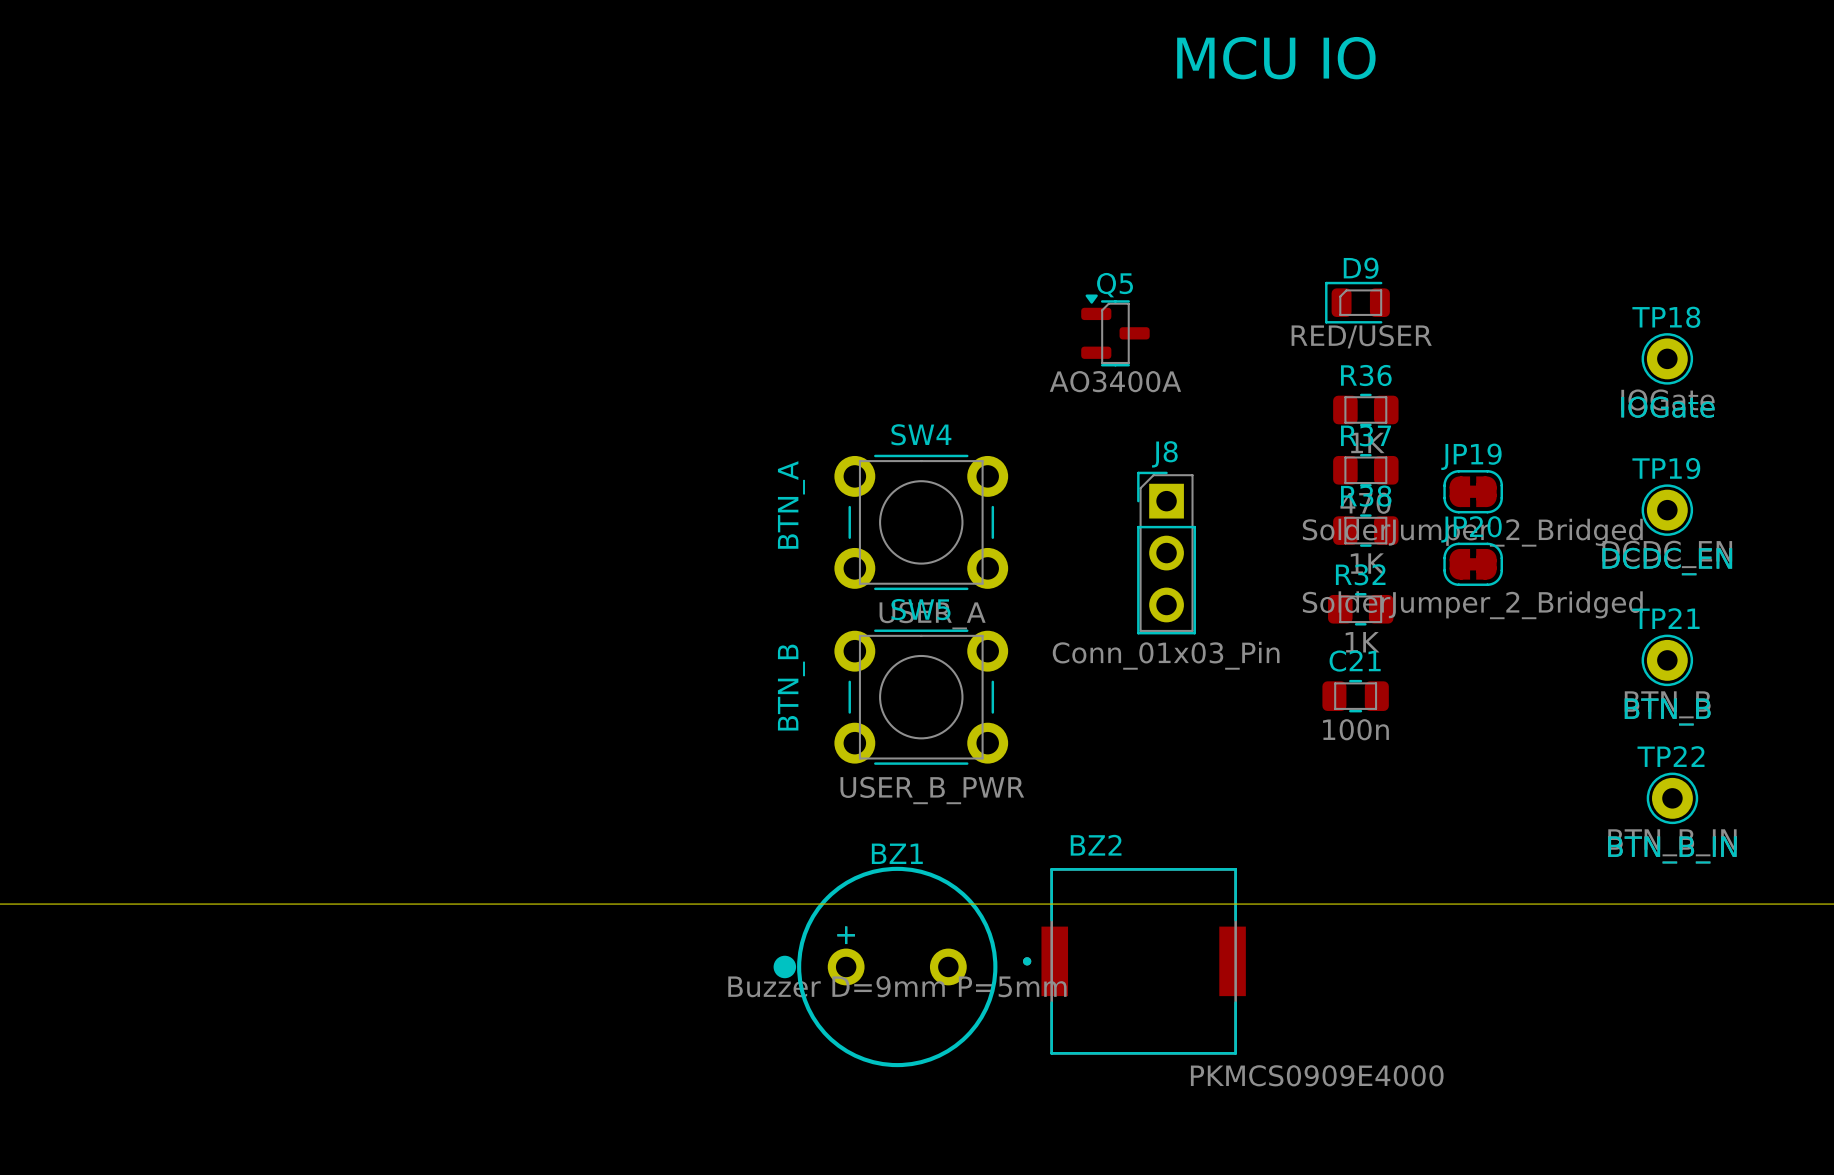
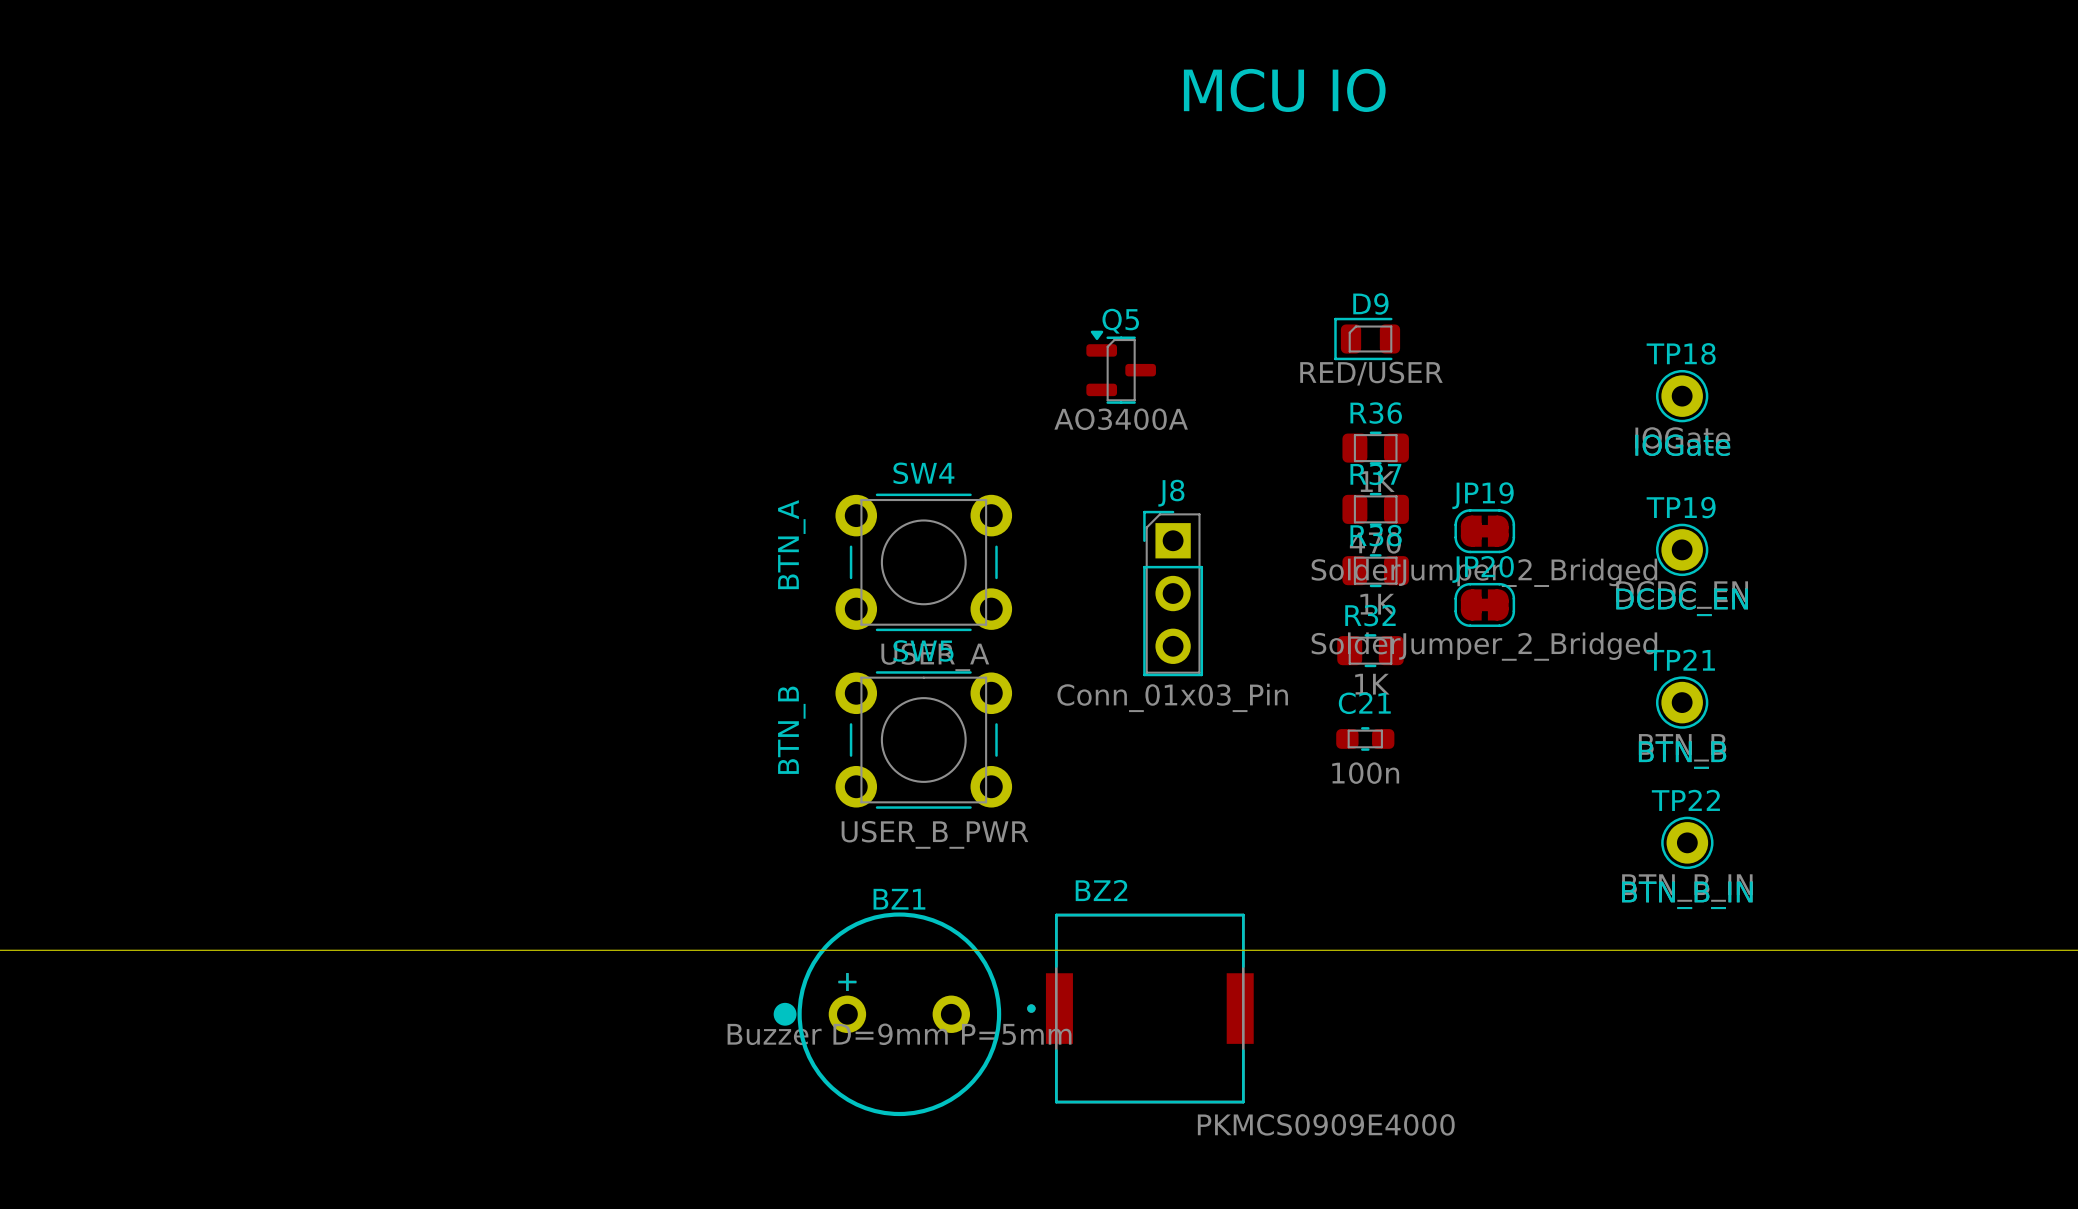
C21 footprint: [1322, 679, 1389, 713] -> [1336, 727, 1395, 751]

